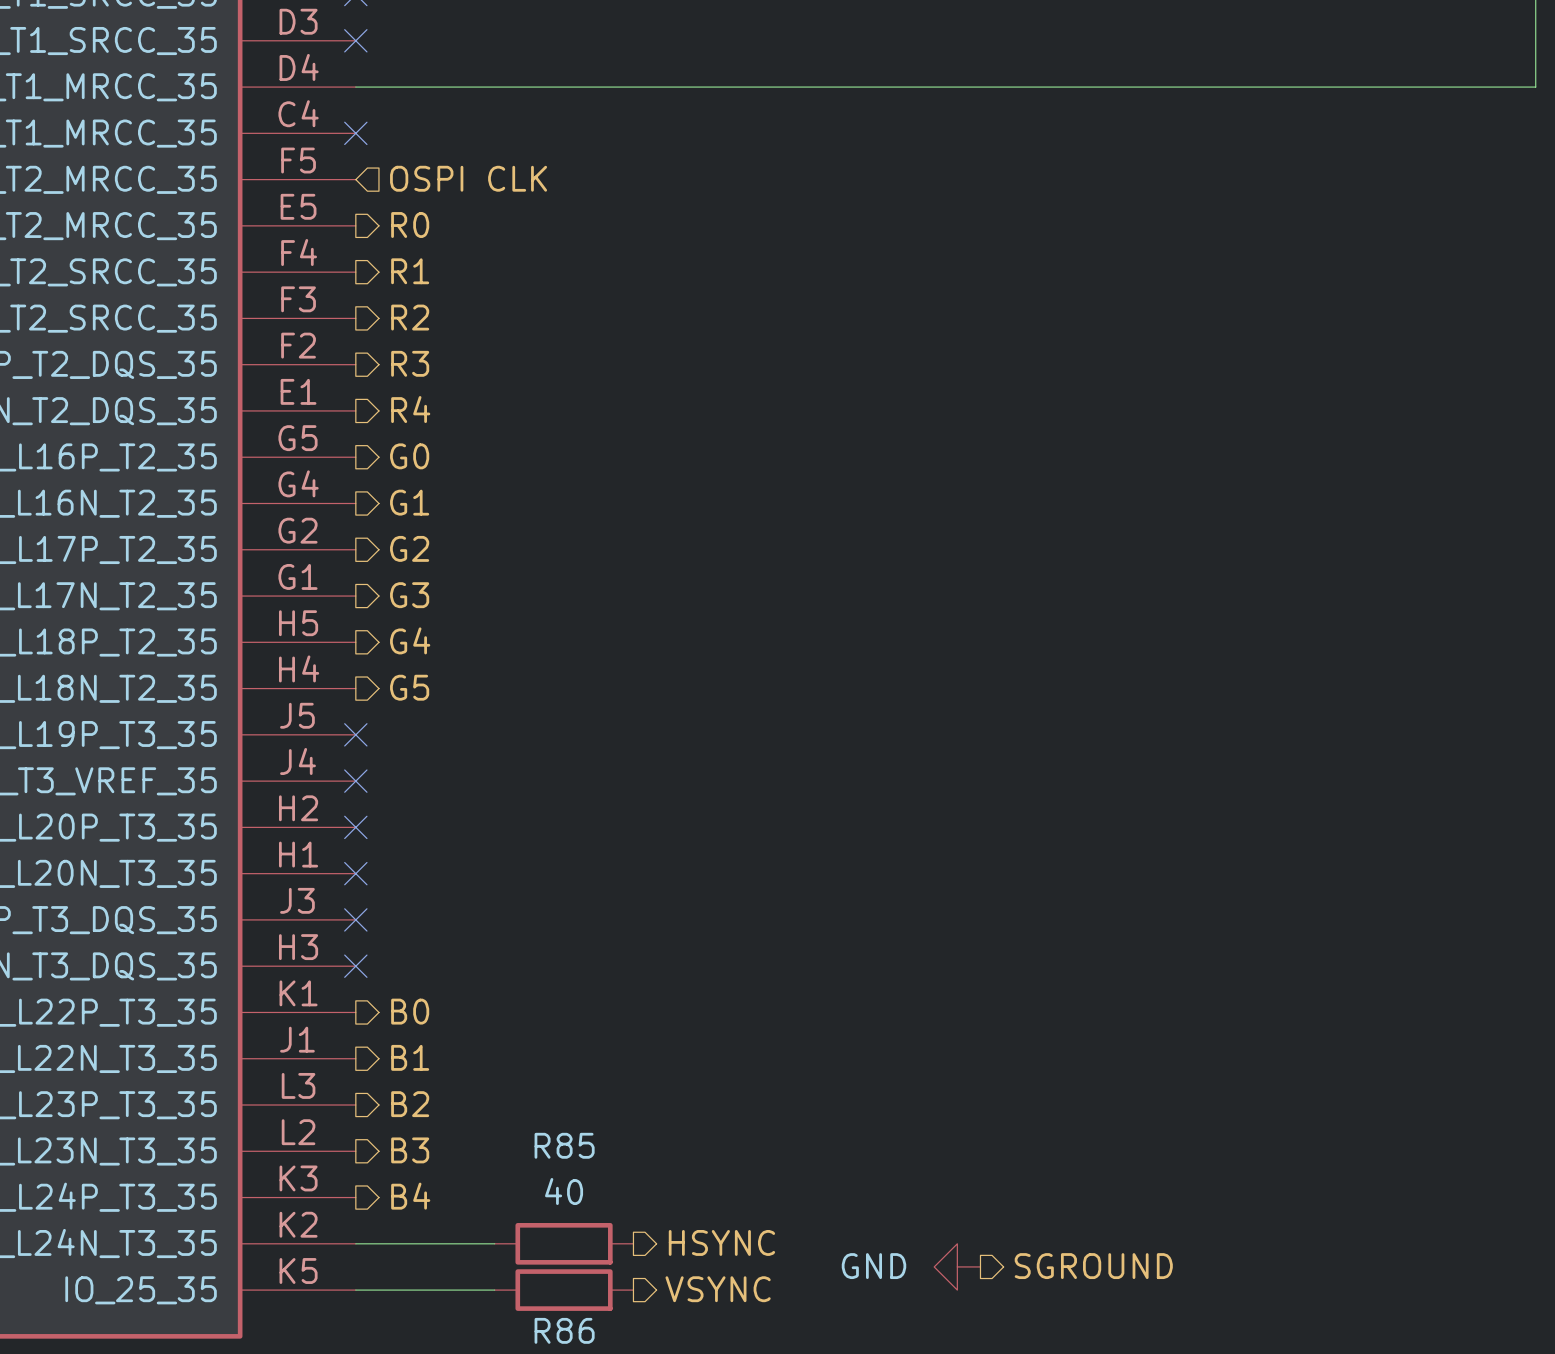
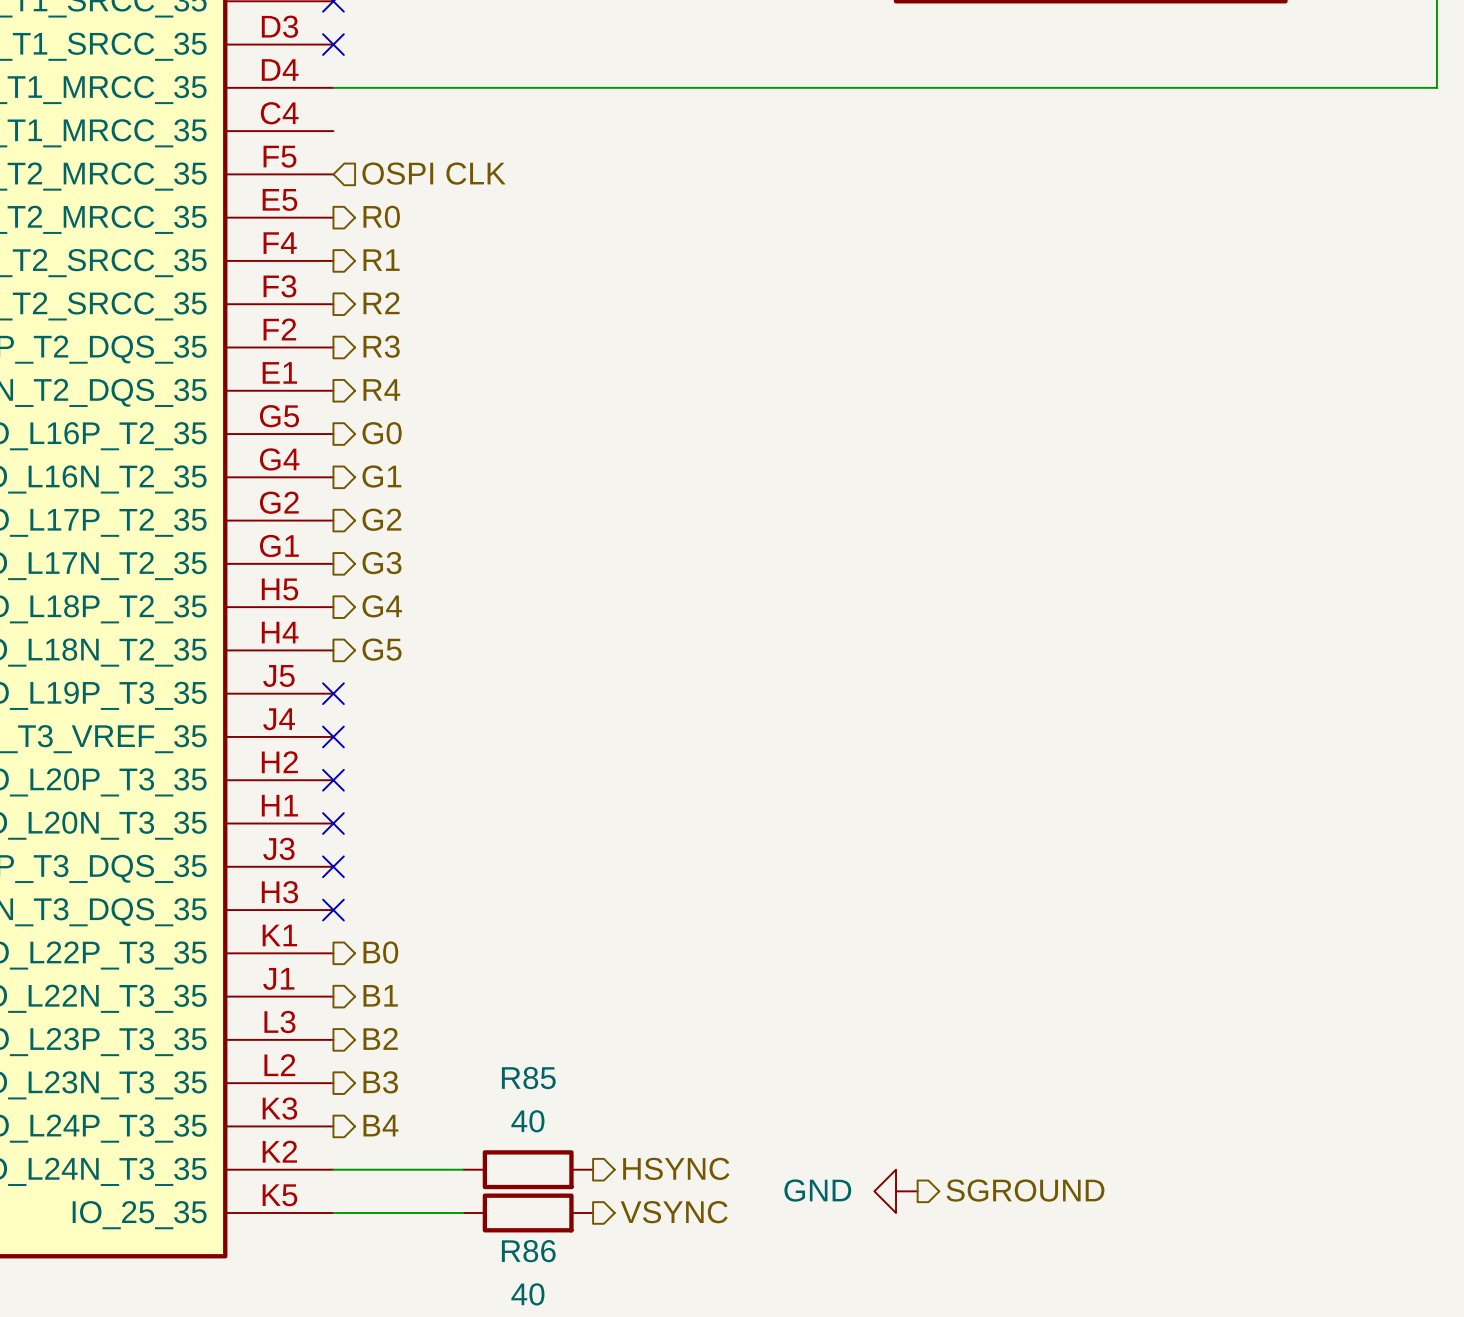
no-connect mark: (355, 133) -> none

